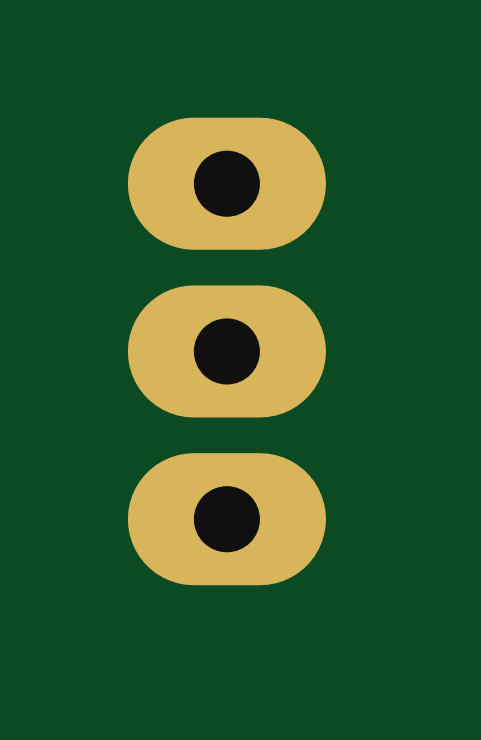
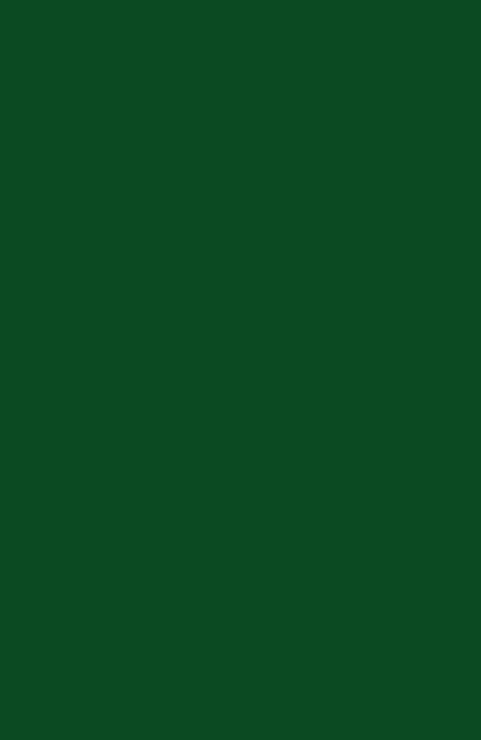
part: (226, 351) -> none

